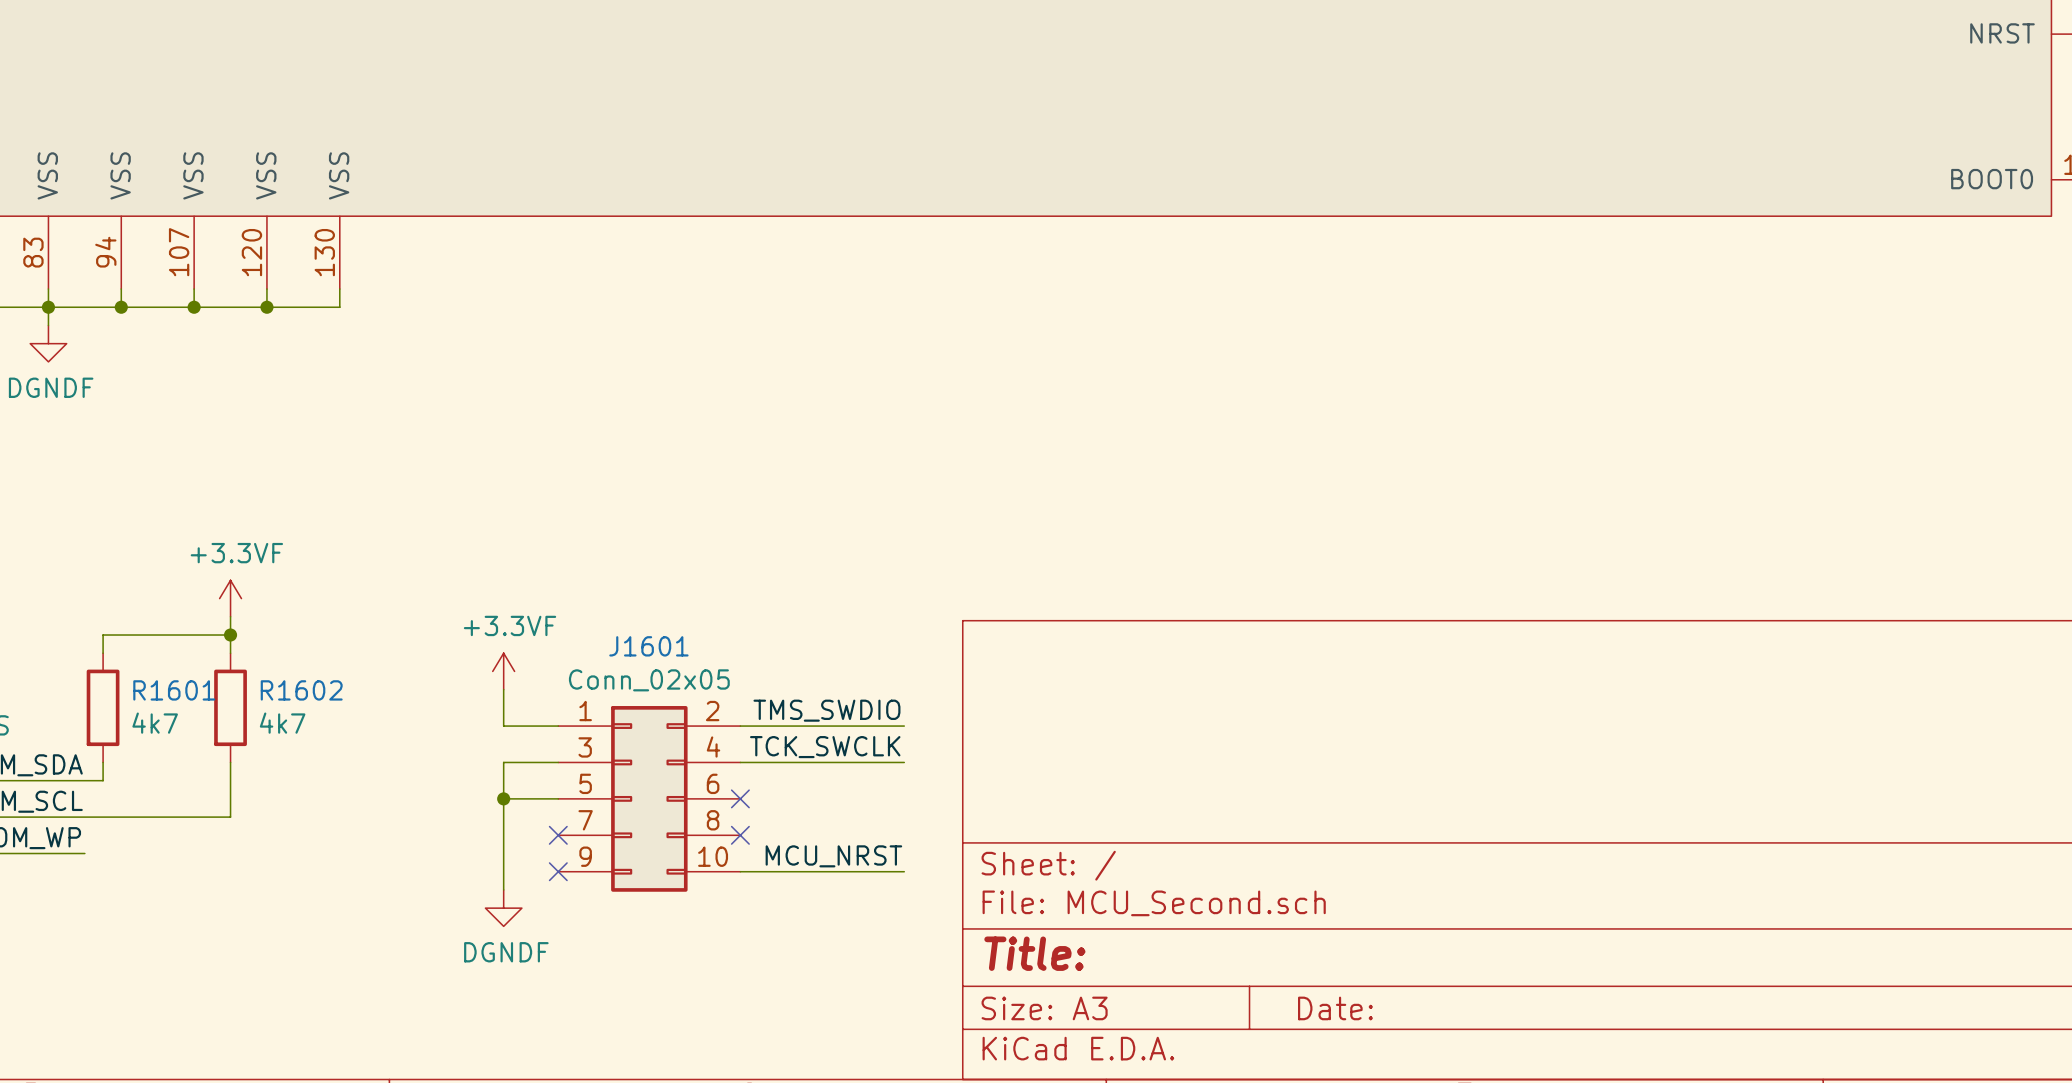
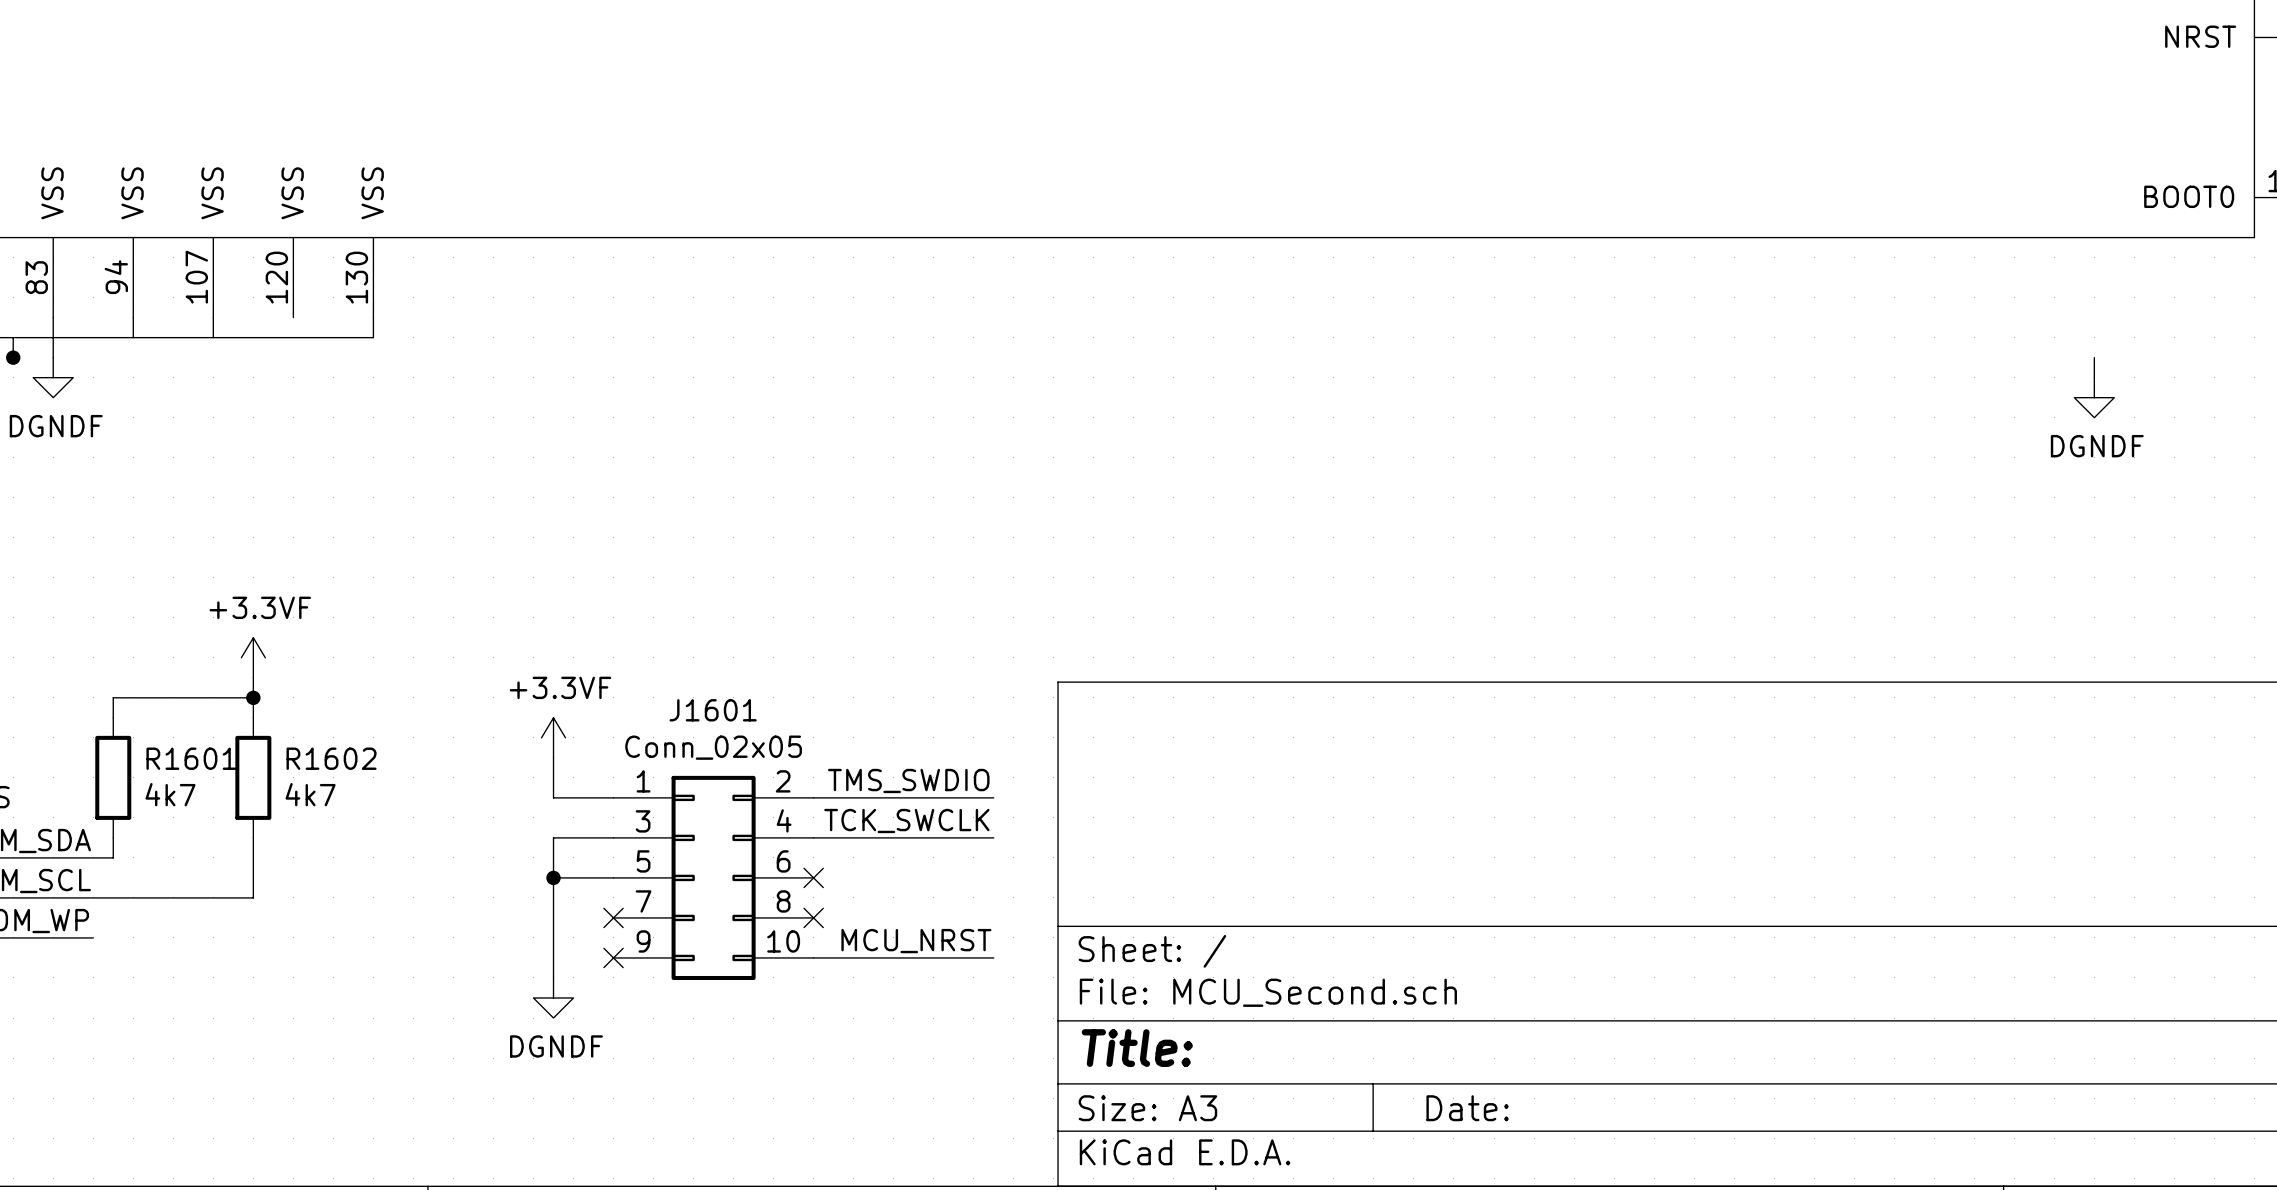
wire: (266, 289) (266, 307) -> (13, 337) (13, 357)
junction: (48, 307) -> none
junction: (121, 307) -> none
junction: (194, 307) -> none
junction: (266, 307) -> none
junction: none -> (13, 357)
wire: none -> (2094, 357) (2094, 377)
power symbol: none -> DGNDF (2094, 397)

